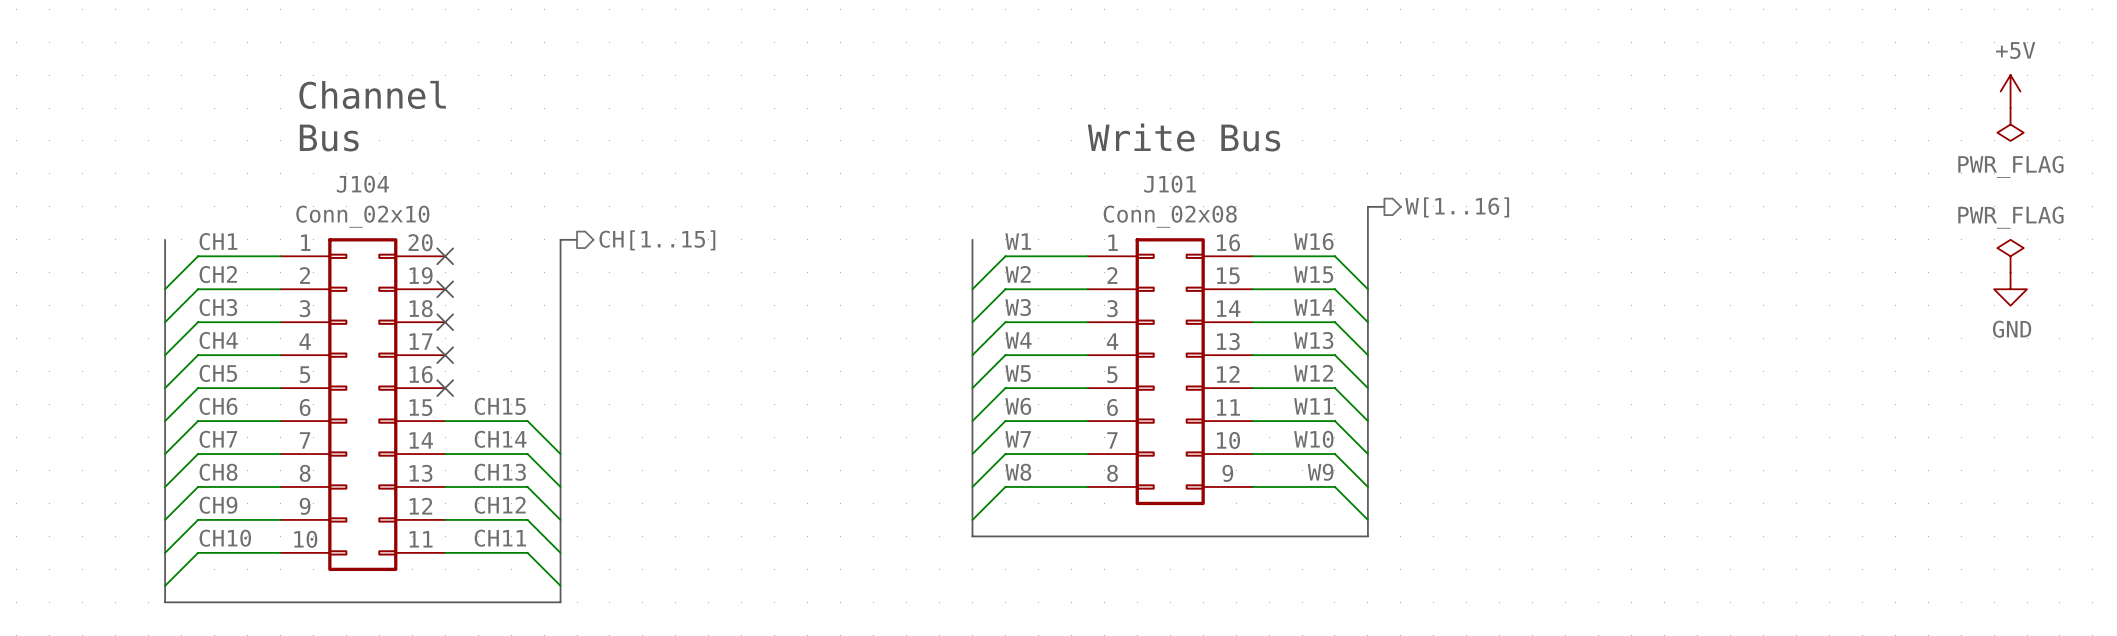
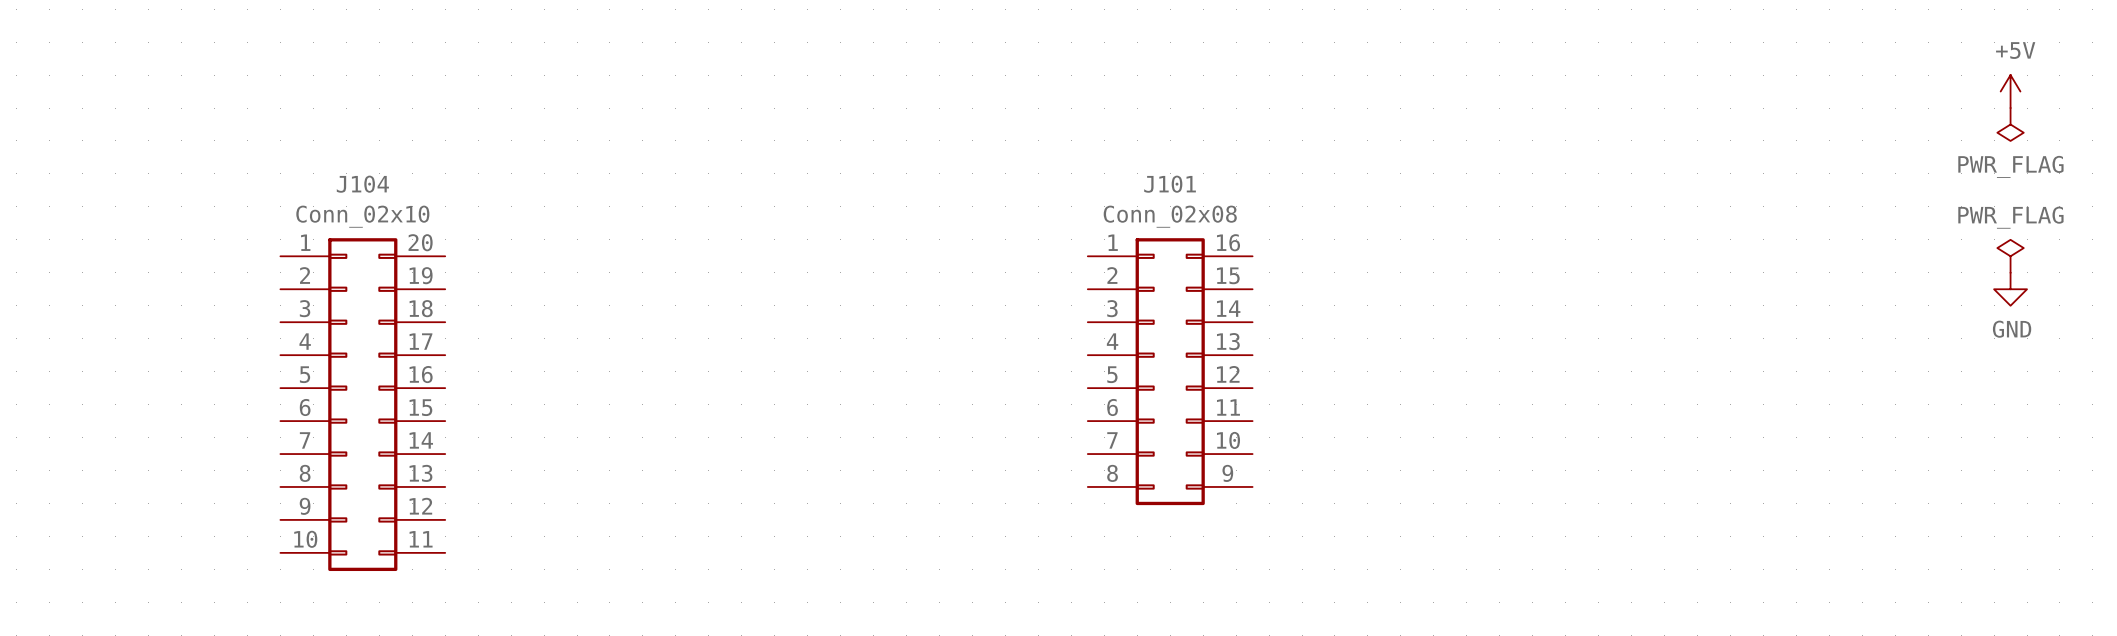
text: Channel (372, 94) -> none
text: Write Bus (1183, 137) -> none
text: Bus (329, 138) -> none
bus: (1384, 206) (1367, 206) (1367, 536) (972, 536) (972, 239) -> none
hierarchical label: W[1..16] (1457, 207) -> none
bus: (165, 239) (165, 602) (560, 602) (560, 239) (577, 239) -> none
hierarchical label: CH[1..15] (657, 240) -> none
label: CH1 (218, 241) -> none
label: W1 (1018, 241) -> none
label: W16 (1313, 241) -> none
wire: (280, 256) (198, 256) (165, 289) -> none
no-connect mark: (445, 256) -> none
wire: (1087, 256) (1005, 256) (972, 289) -> none
wire: (1252, 256) (1334, 256) (1367, 289) -> none
label: CH2 (218, 274) -> none
label: W2 (1018, 274) -> none
label: W15 (1313, 274) -> none
wire: (280, 289) (198, 289) (165, 322) -> none
no-connect mark: (445, 289) -> none
wire: (1087, 289) (1005, 289) (972, 322) -> none
wire: (1252, 289) (1334, 289) (1367, 322) -> none
label: CH3 (218, 307) -> none
label: W3 (1018, 307) -> none
label: W14 (1314, 307) -> none
wire: (280, 322) (198, 322) (165, 355) -> none
no-connect mark: (445, 322) -> none
wire: (1087, 322) (1005, 322) (972, 355) -> none
wire: (1252, 322) (1334, 322) (1367, 355) -> none
label: CH4 (218, 340) -> none
label: W4 (1018, 340) -> none
label: W13 (1313, 340) -> none
wire: (280, 355) (198, 355) (165, 388) -> none
no-connect mark: (445, 355) -> none
wire: (1087, 355) (1005, 355) (972, 388) -> none
wire: (1252, 355) (1334, 355) (1367, 388) -> none
label: CH5 (218, 373) -> none
label: W5 (1018, 373) -> none
label: W12 (1313, 373) -> none
wire: (280, 388) (198, 388) (165, 421) -> none
no-connect mark: (445, 388) -> none
wire: (1087, 388) (1005, 388) (972, 421) -> none
wire: (1252, 388) (1334, 388) (1367, 421) -> none
label: CH6 (218, 406) -> none
label: CH15 (500, 406) -> none
label: W6 (1018, 406) -> none
label: W11 (1313, 406) -> none
wire: (280, 421) (198, 421) (165, 454) -> none
wire: (445, 421) (527, 421) (560, 454) -> none
wire: (1087, 421) (1005, 421) (972, 454) -> none
wire: (1252, 421) (1334, 421) (1367, 454) -> none
label: CH7 (218, 439) -> none
label: CH14 (500, 439) -> none
label: W7 (1018, 439) -> none
label: W10 (1313, 439) -> none
wire: (280, 454) (198, 454) (165, 486) -> none
wire: (445, 454) (527, 454) (560, 486) -> none
wire: (1087, 454) (1005, 454) (972, 486) -> none
wire: (1252, 454) (1334, 454) (1367, 486) -> none
label: CH8 (218, 472) -> none
label: CH13 (500, 472) -> none
label: W8 (1018, 472) -> none
label: W9 (1320, 472) -> none
wire: (280, 486) (198, 486) (165, 519) -> none
wire: (445, 486) (527, 486) (560, 519) -> none
wire: (1087, 486) (1005, 486) (972, 519) -> none
wire: (1252, 486) (1334, 486) (1367, 519) -> none
label: CH9 (218, 505) -> none
label: CH12 (500, 505) -> none
wire: (280, 519) (198, 519) (165, 552) -> none
wire: (445, 519) (527, 519) (560, 552) -> none
label: CH10 (225, 538) -> none
label: CH11 (500, 538) -> none
wire: (280, 552) (198, 552) (165, 585) -> none
wire: (445, 552) (527, 552) (560, 585) -> none

